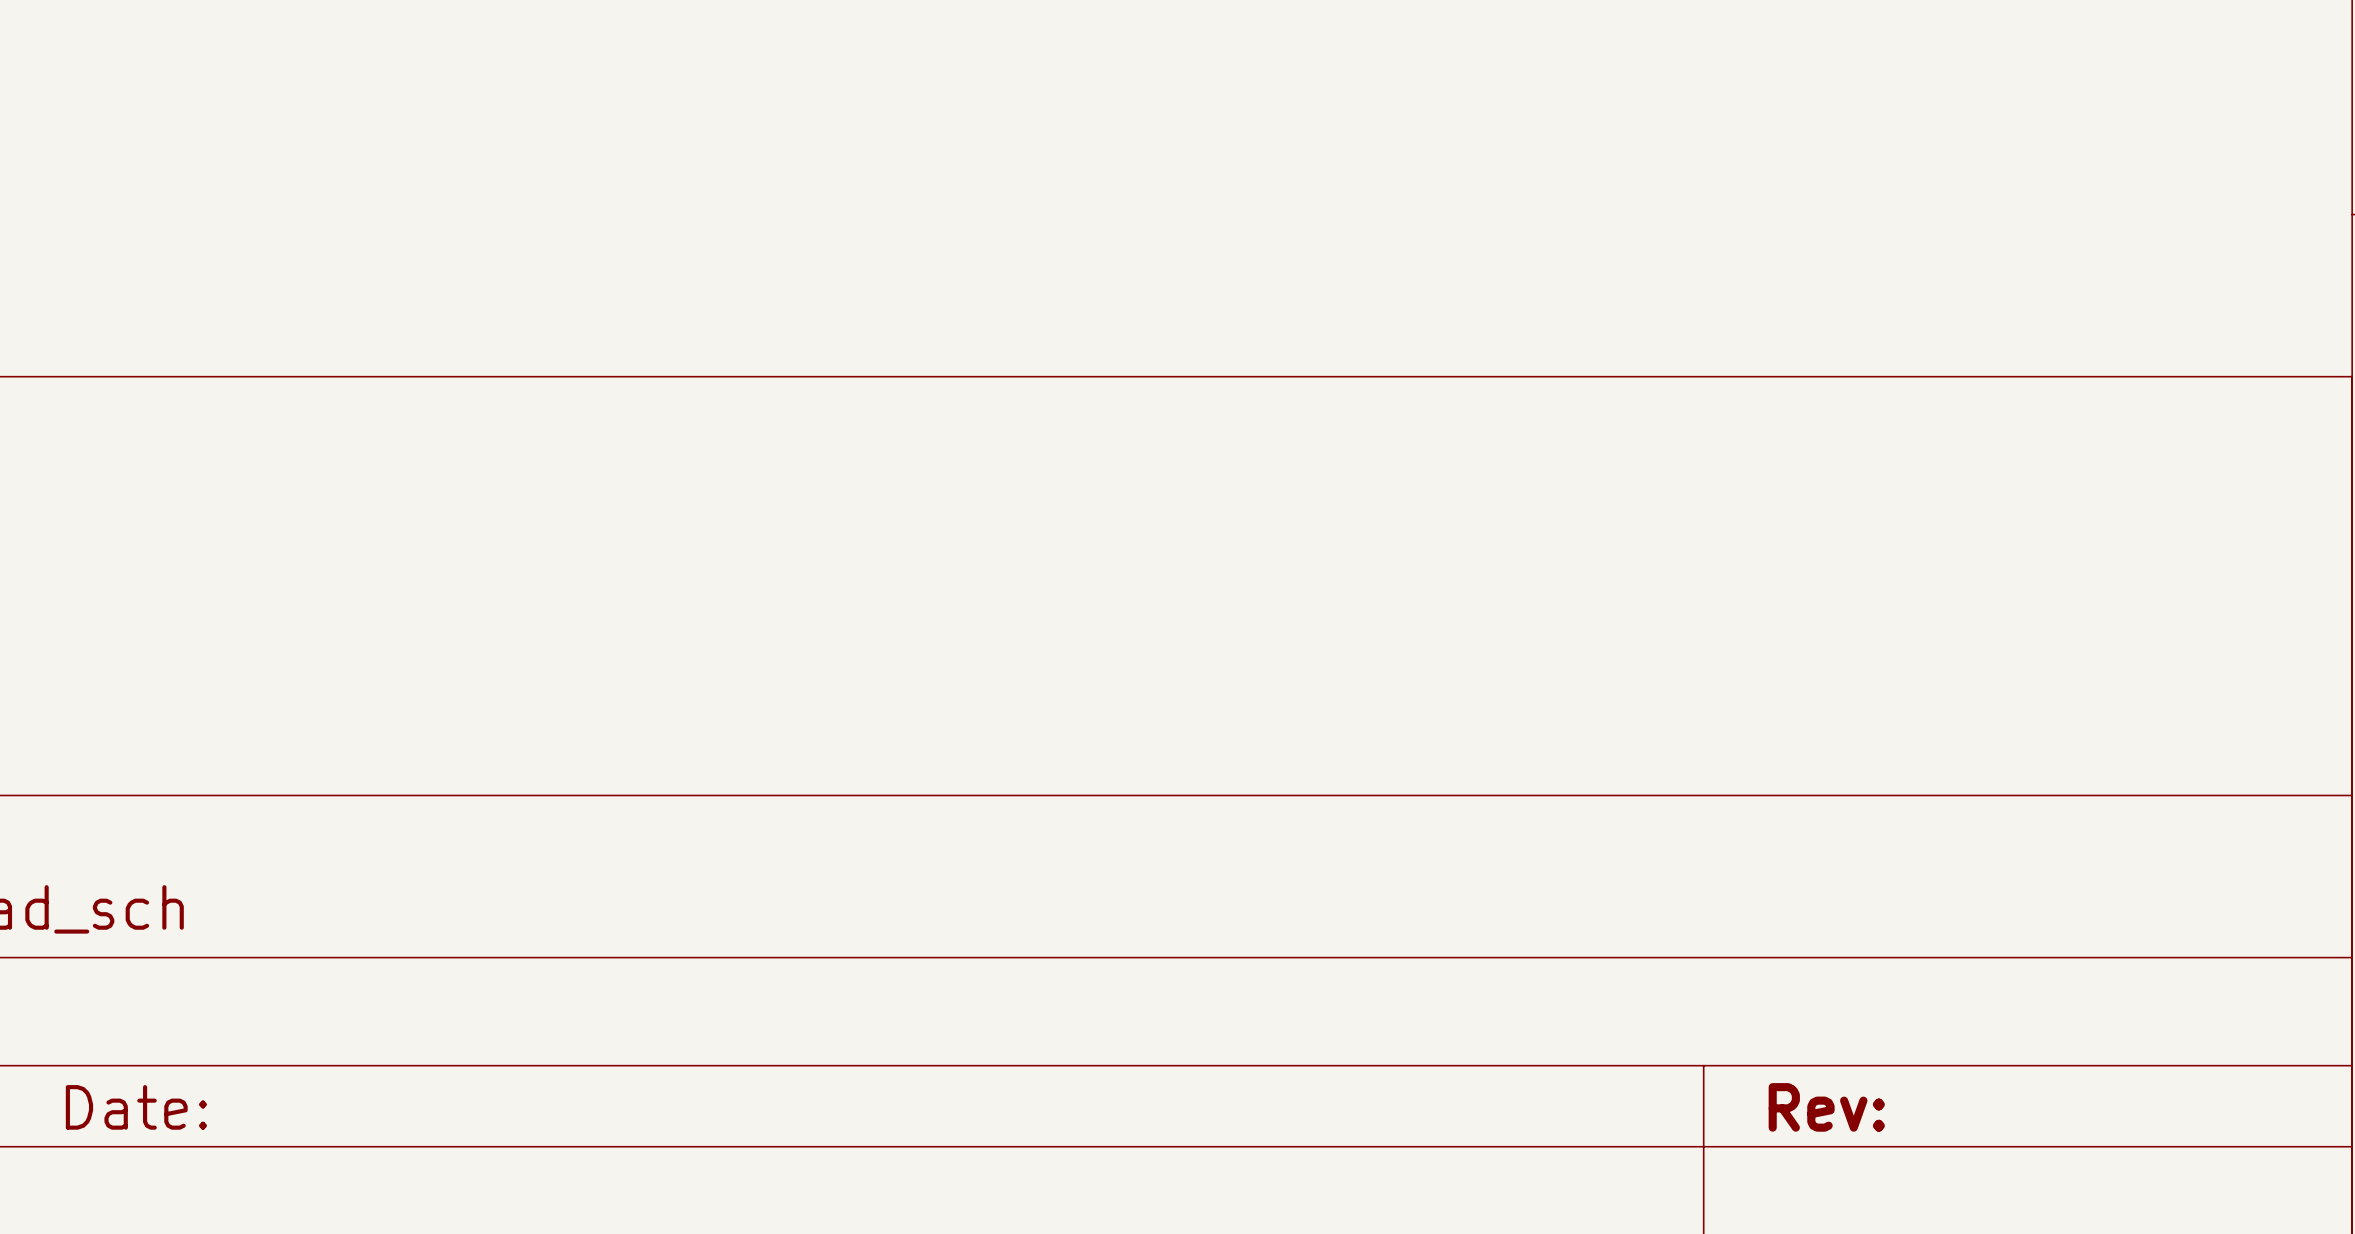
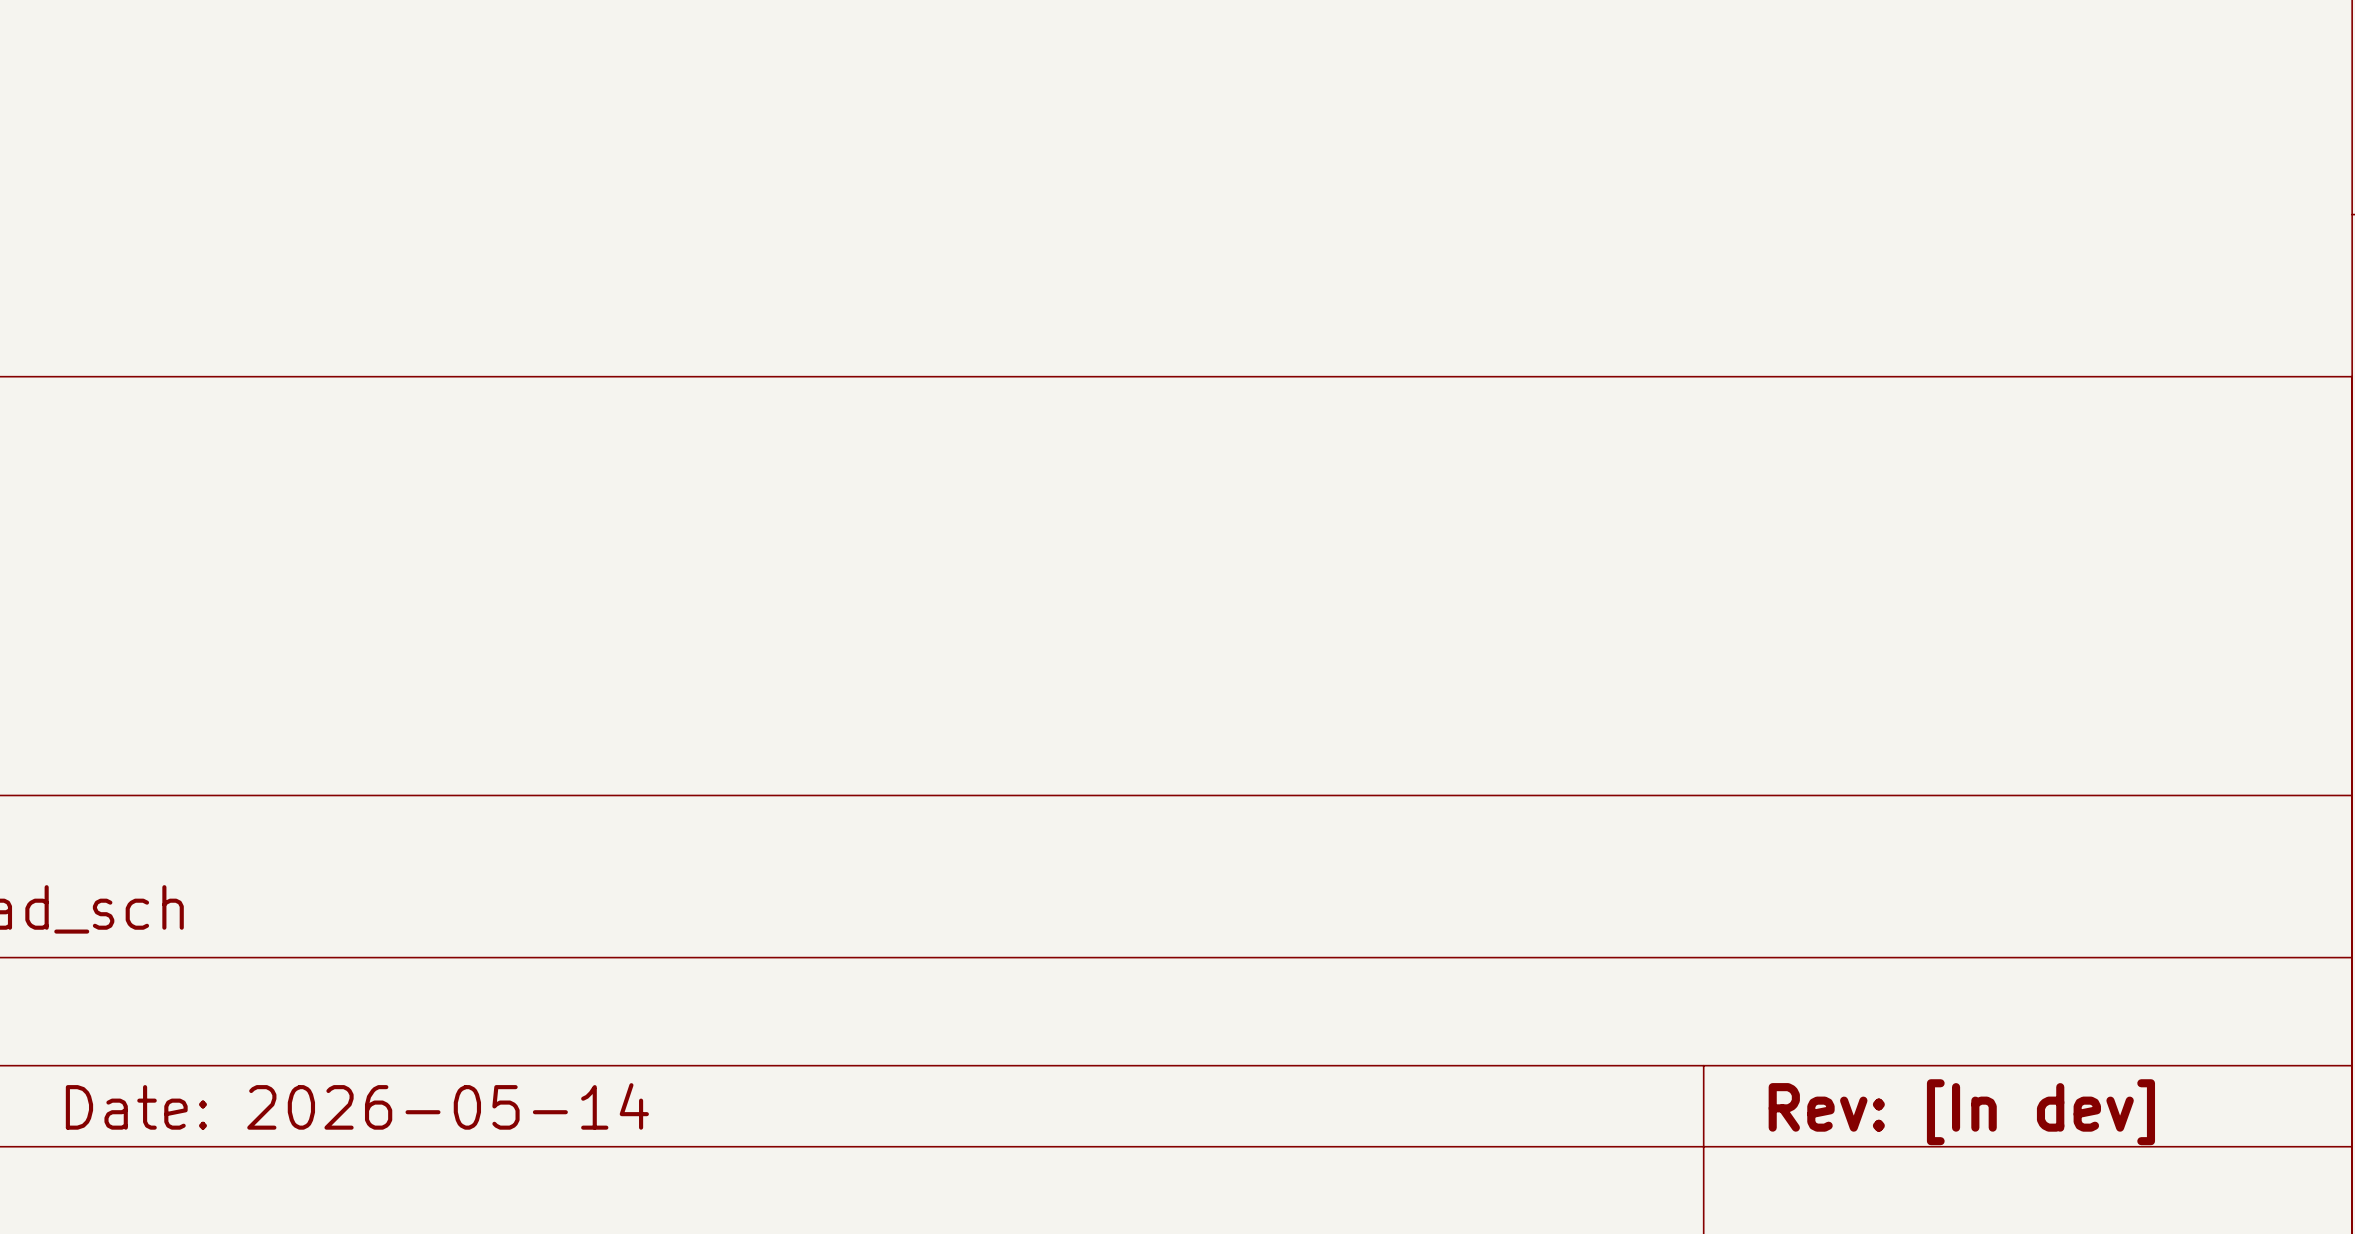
title block: Date: (136, 1107) -> Date: 2026-05-14 (357, 1106)
title block: Rev: (1826, 1107) -> Rev: [In dev] (1961, 1112)

